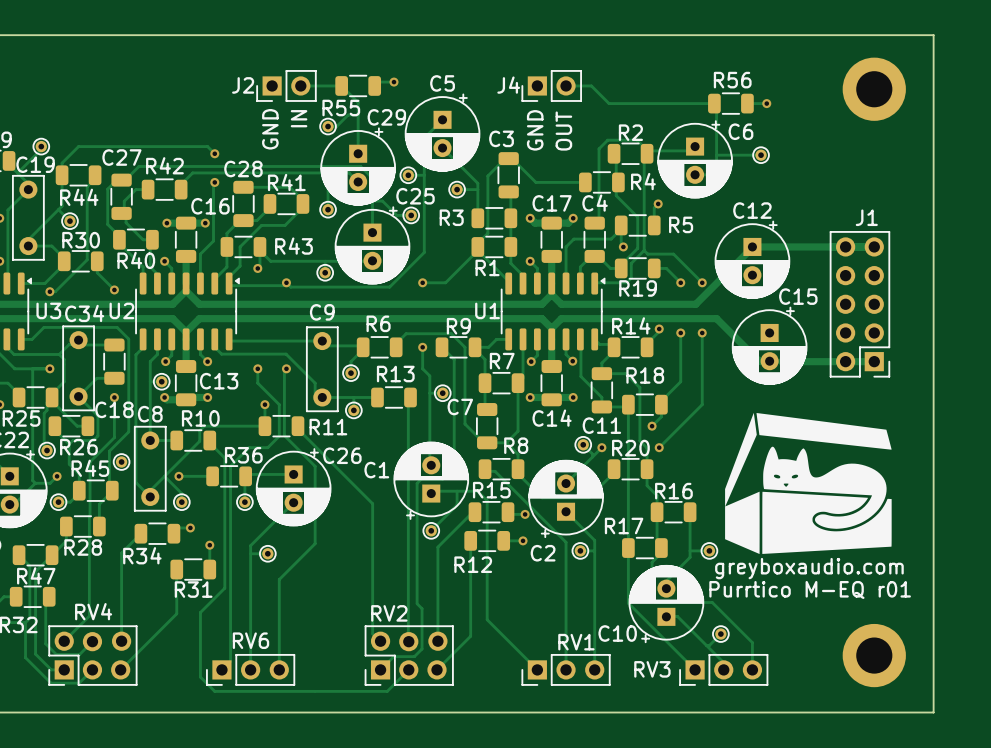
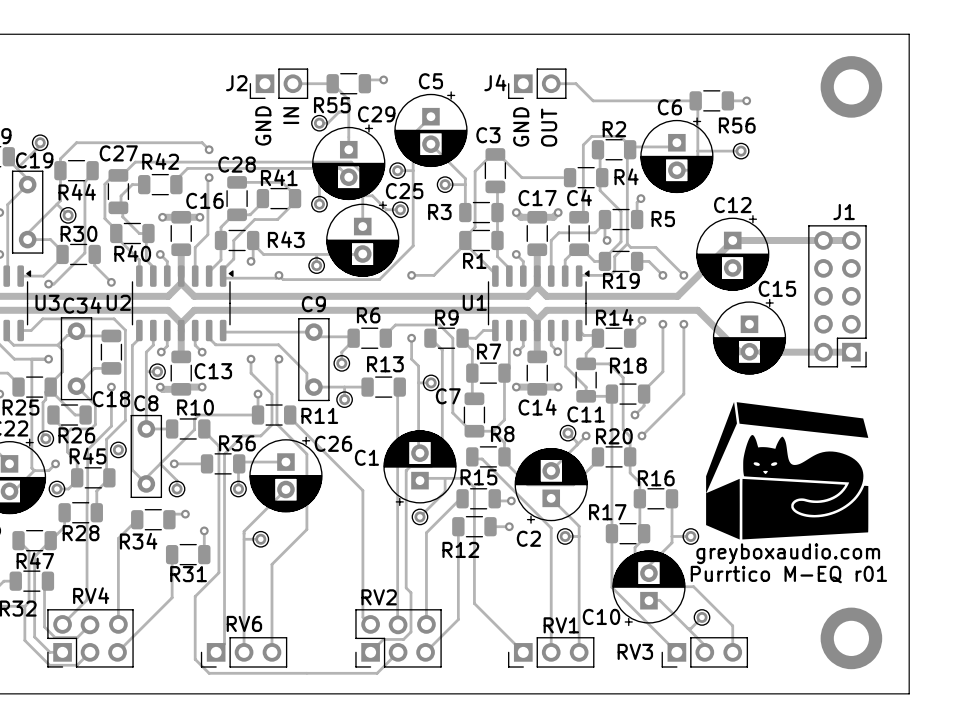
R56 name position: R56 (732, 80) -> R56 (737, 125)
C6 name position: C6 (740, 131) -> C6 (669, 107)

